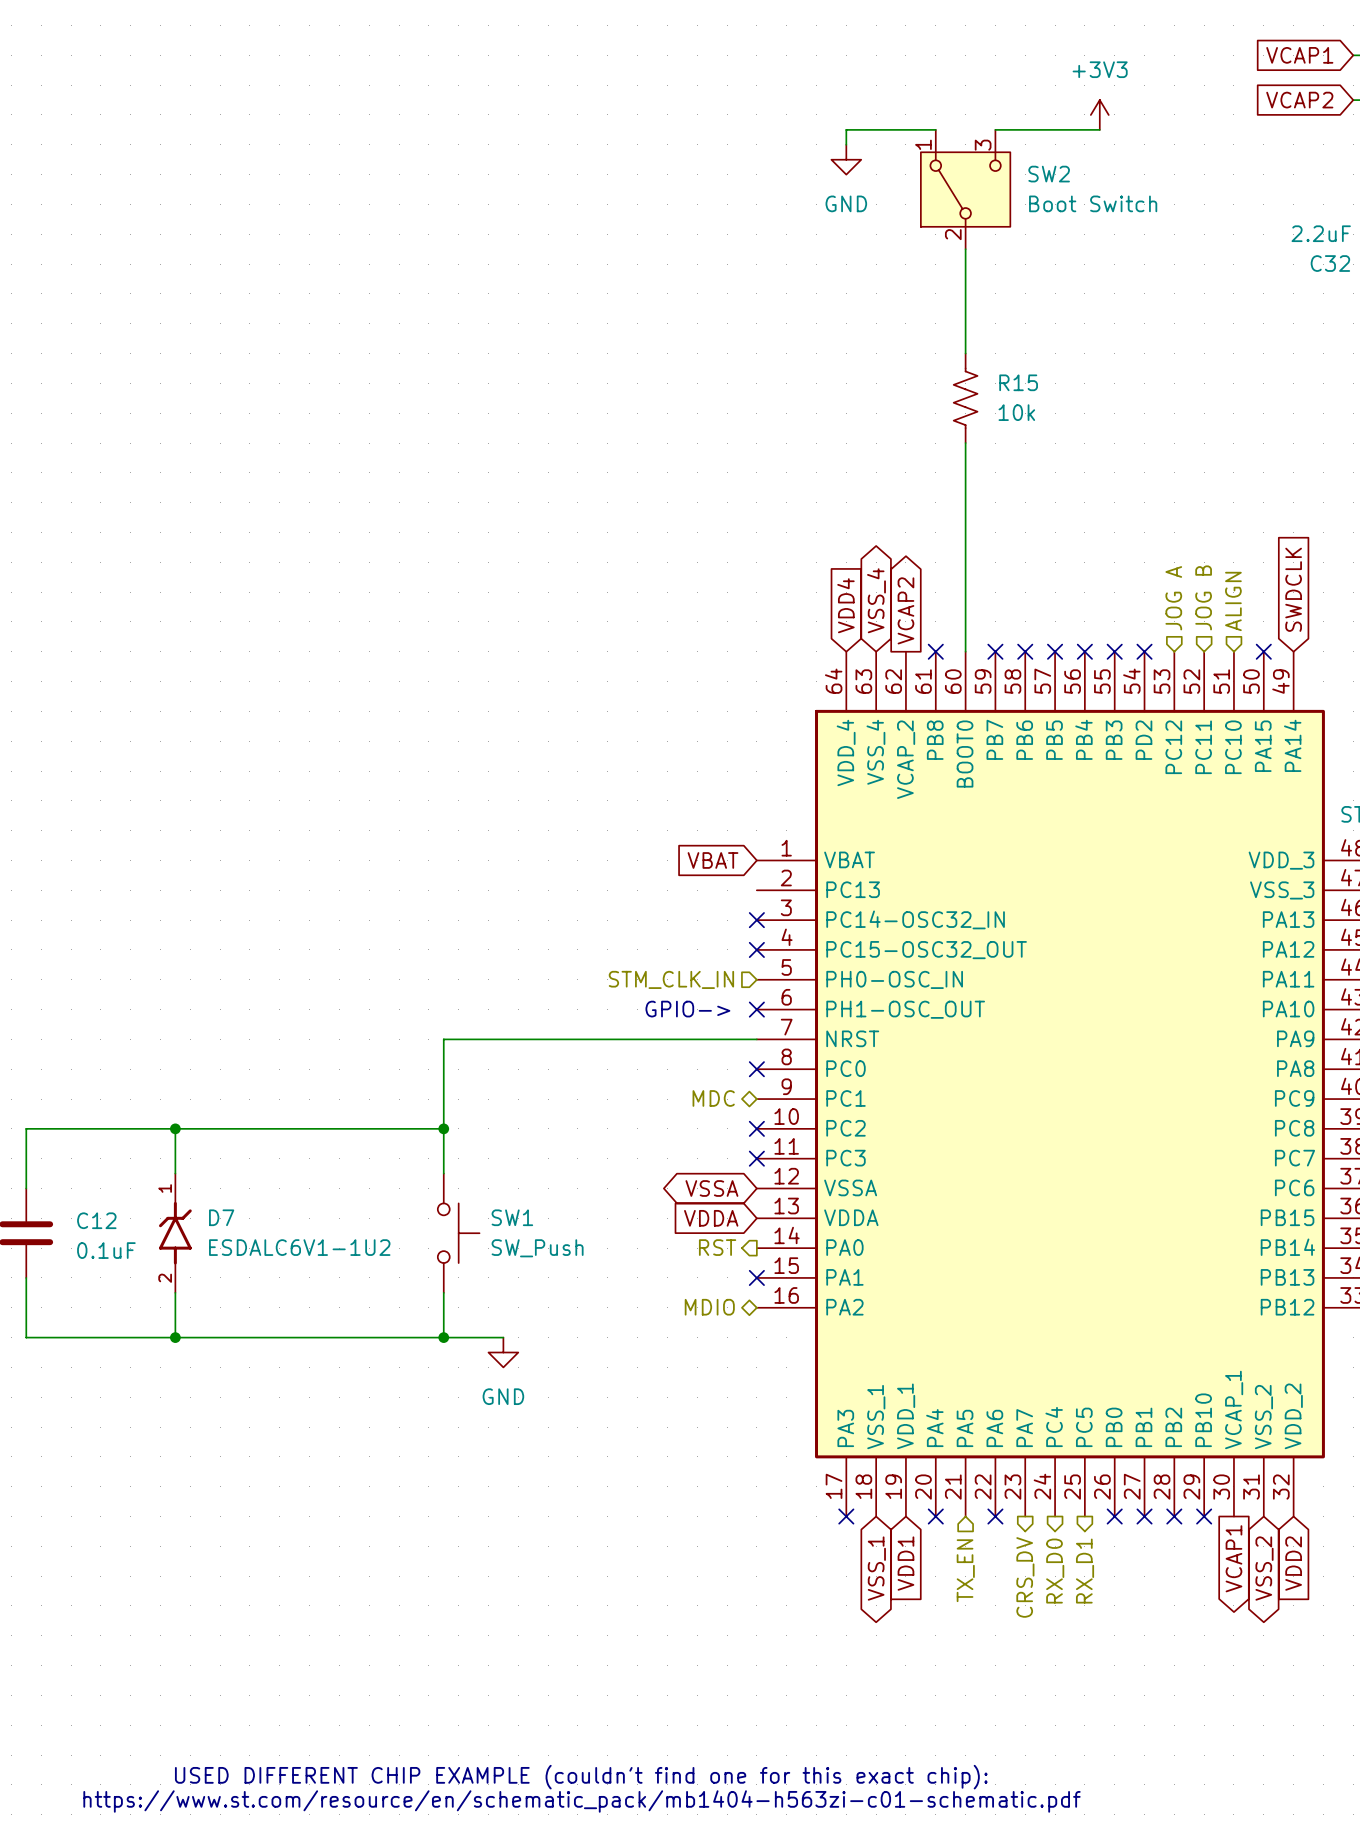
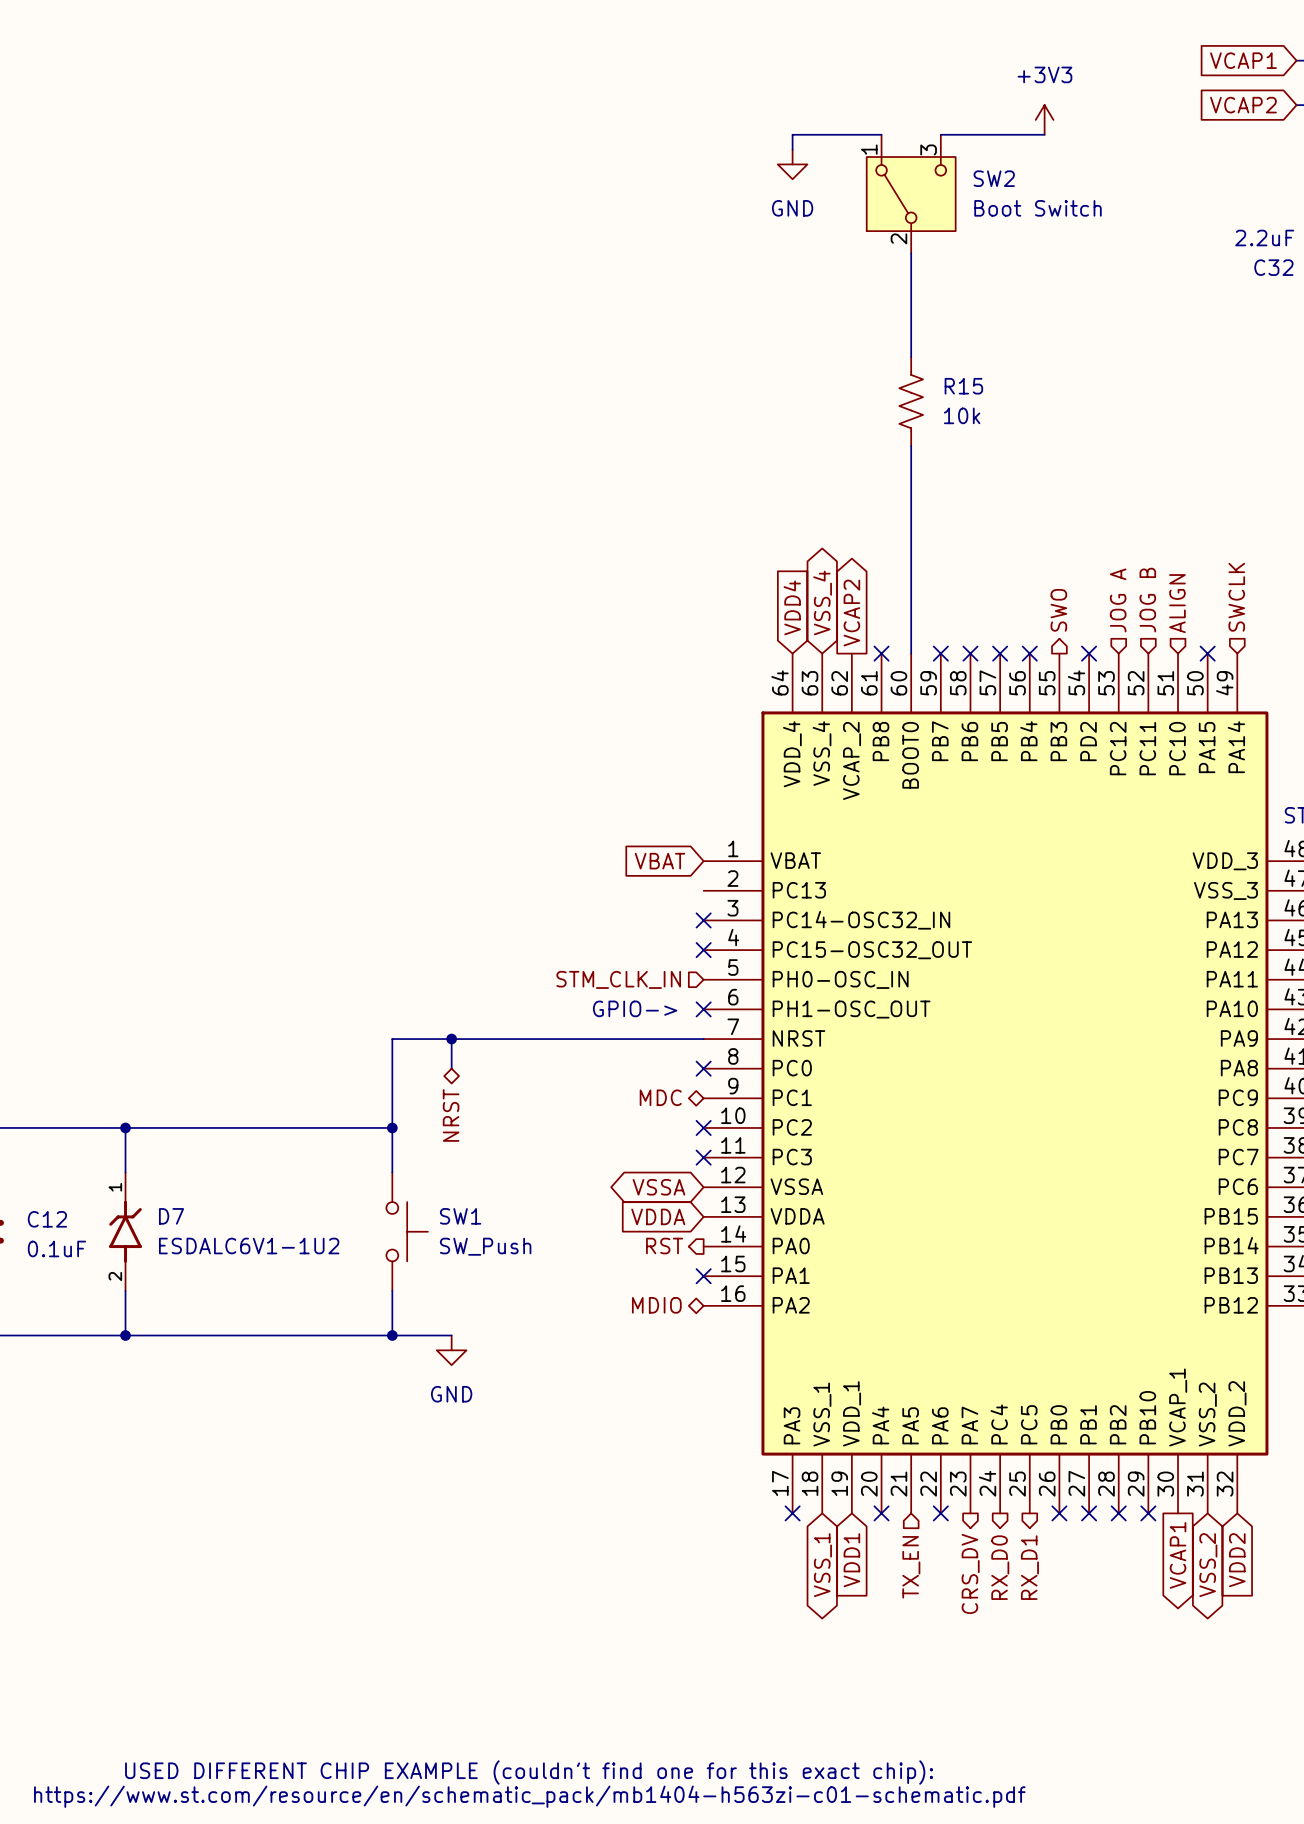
global label: SWDCLK (1293, 589) -> none
hierarchical label: none -> SWCLK (1236, 597)
hierarchical label: none -> SWO (1058, 610)
no-connect mark: (1114, 651) -> none
wire: none -> (451, 1039) (451, 1068)
junction: none -> (451, 1039)
hierarchical label: none -> NRST (451, 1115)

